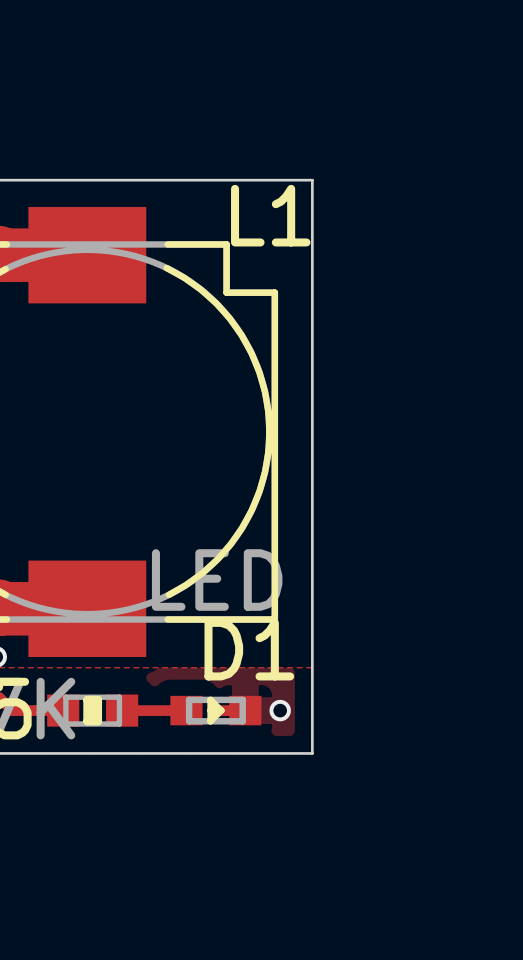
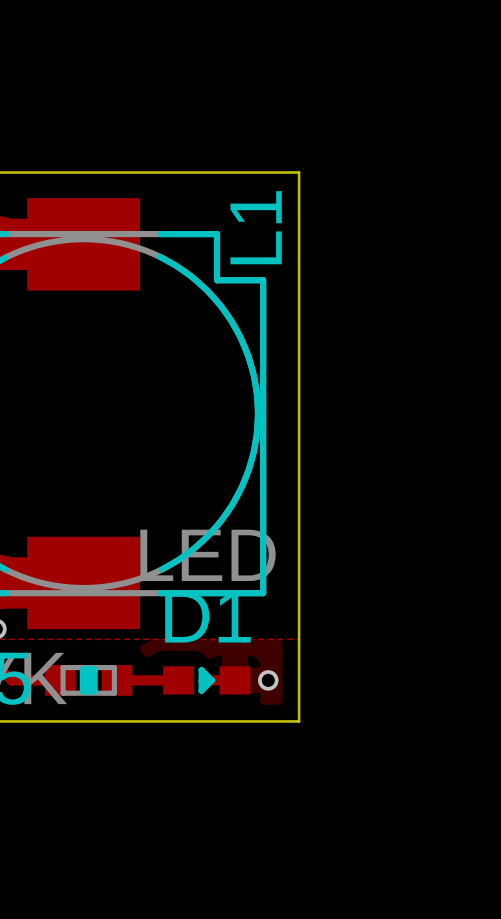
L1 name rotation: 0° (270, 215) -> 90° counterclockwise (256, 227)
D1 footprint: [170, 695, 262, 726] -> [163, 666, 251, 695]

